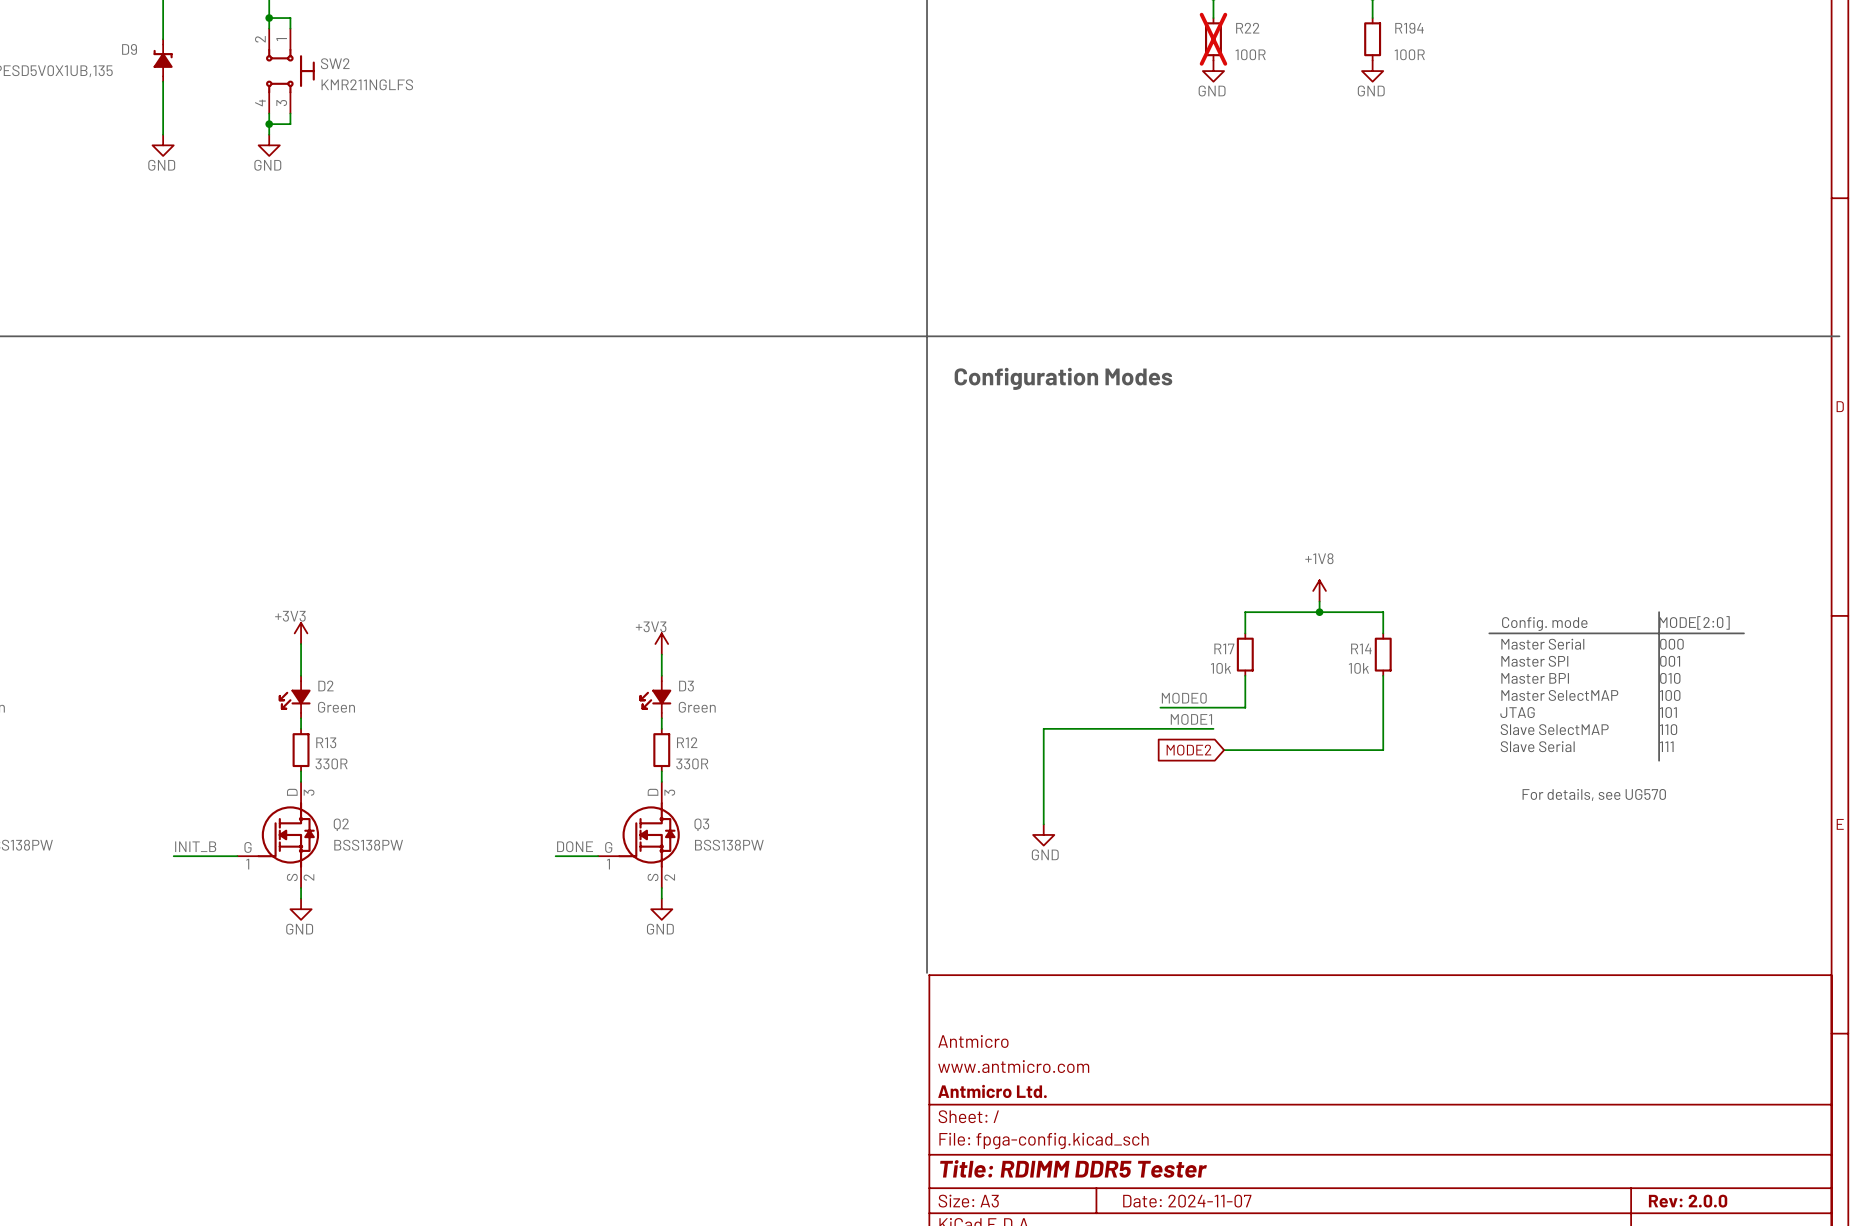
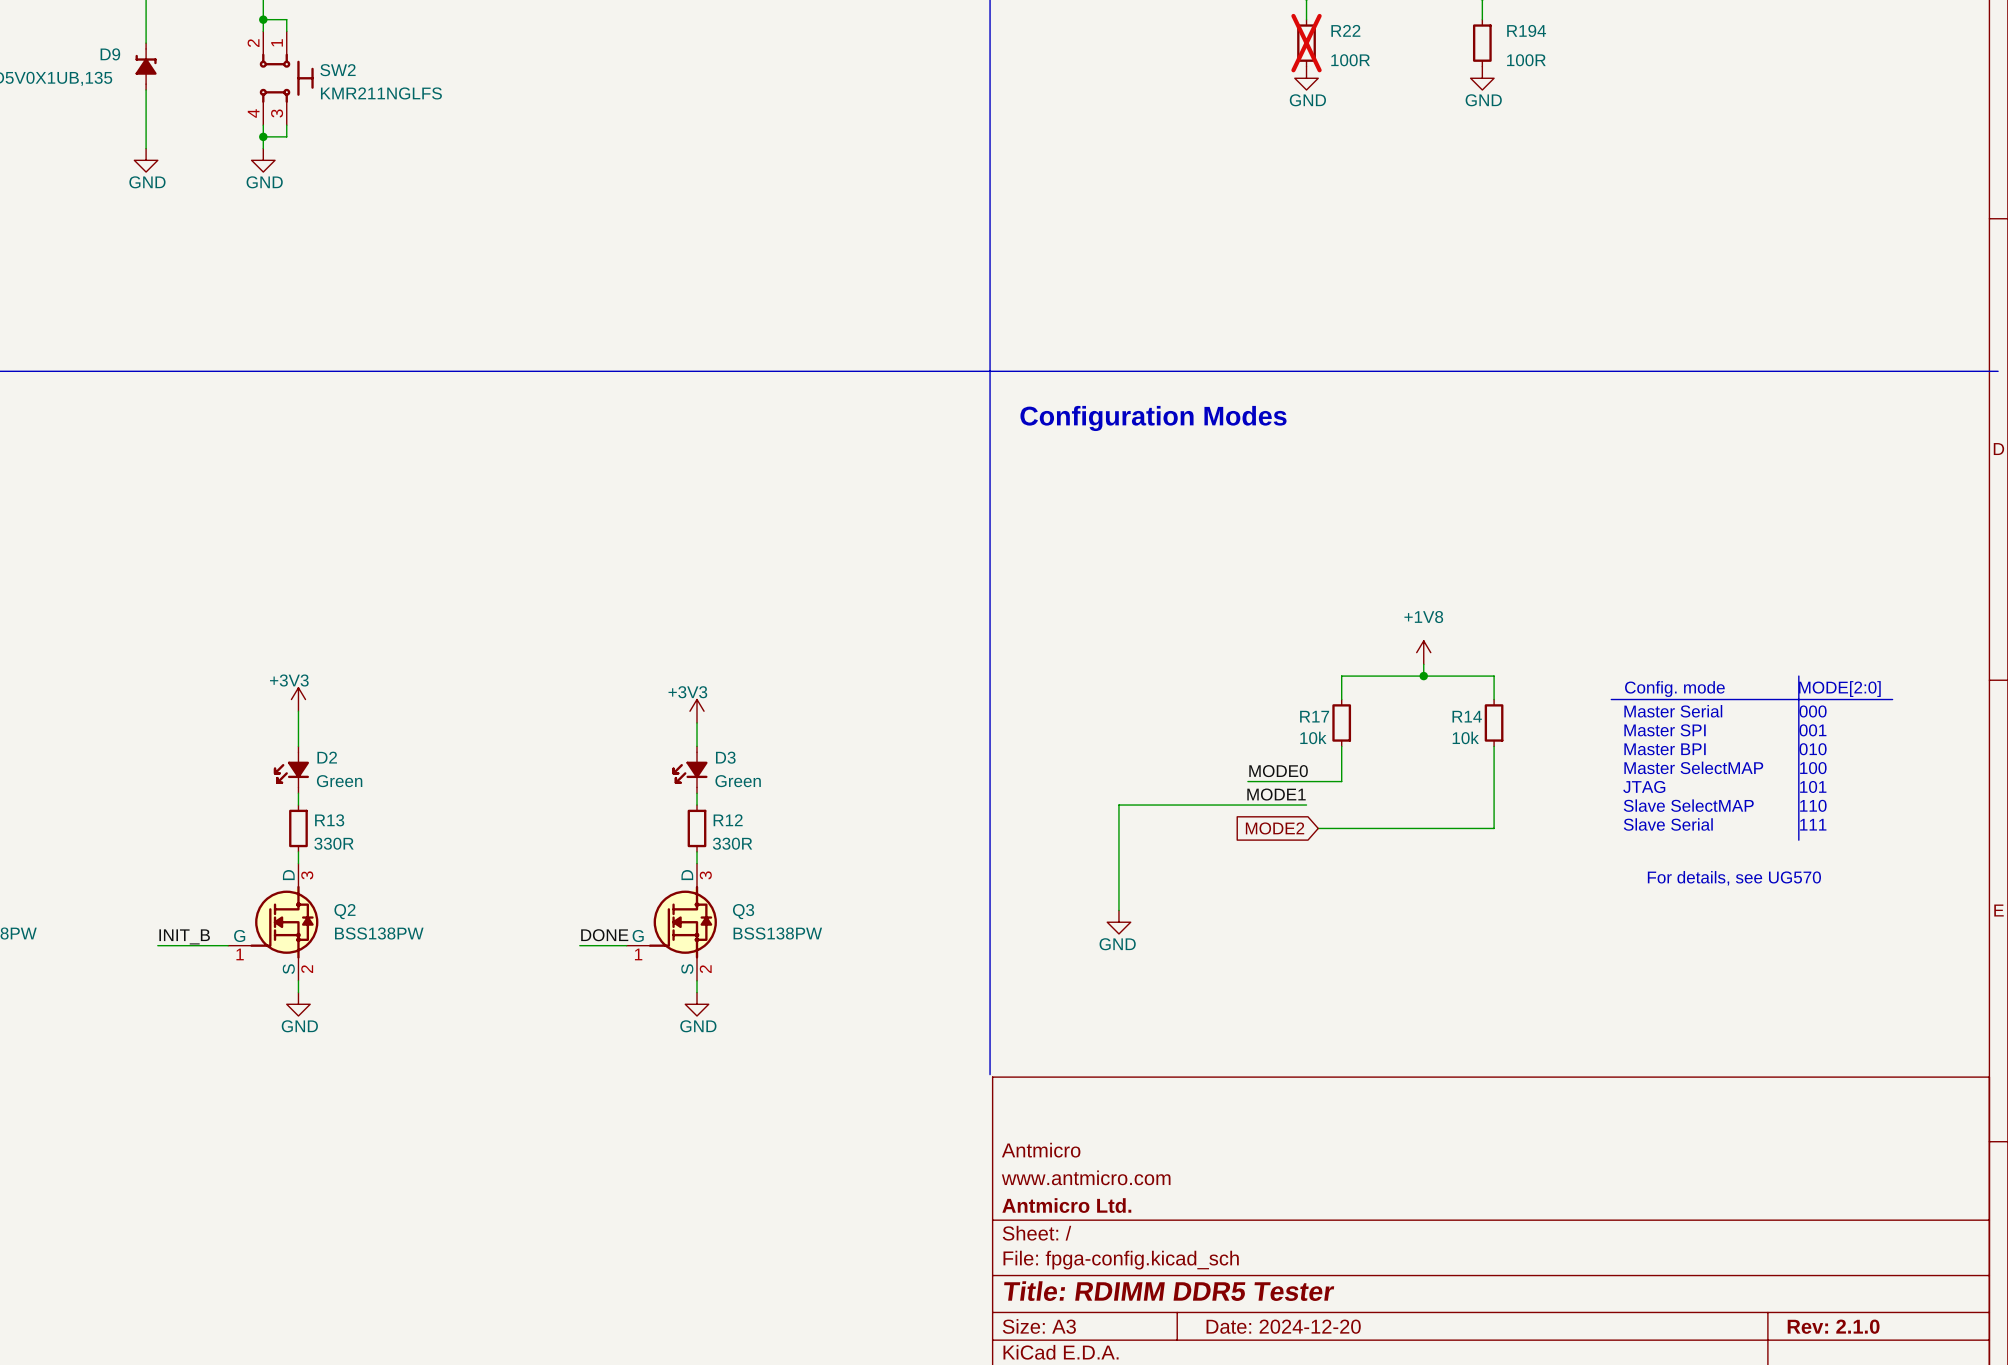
title block: Date: 2024-11-07 (1187, 1201) -> Date: 2024-12-20 (1283, 1326)
title block: Rev: 2.0.0 (1688, 1201) -> Rev: 2.1.0 (1833, 1326)

